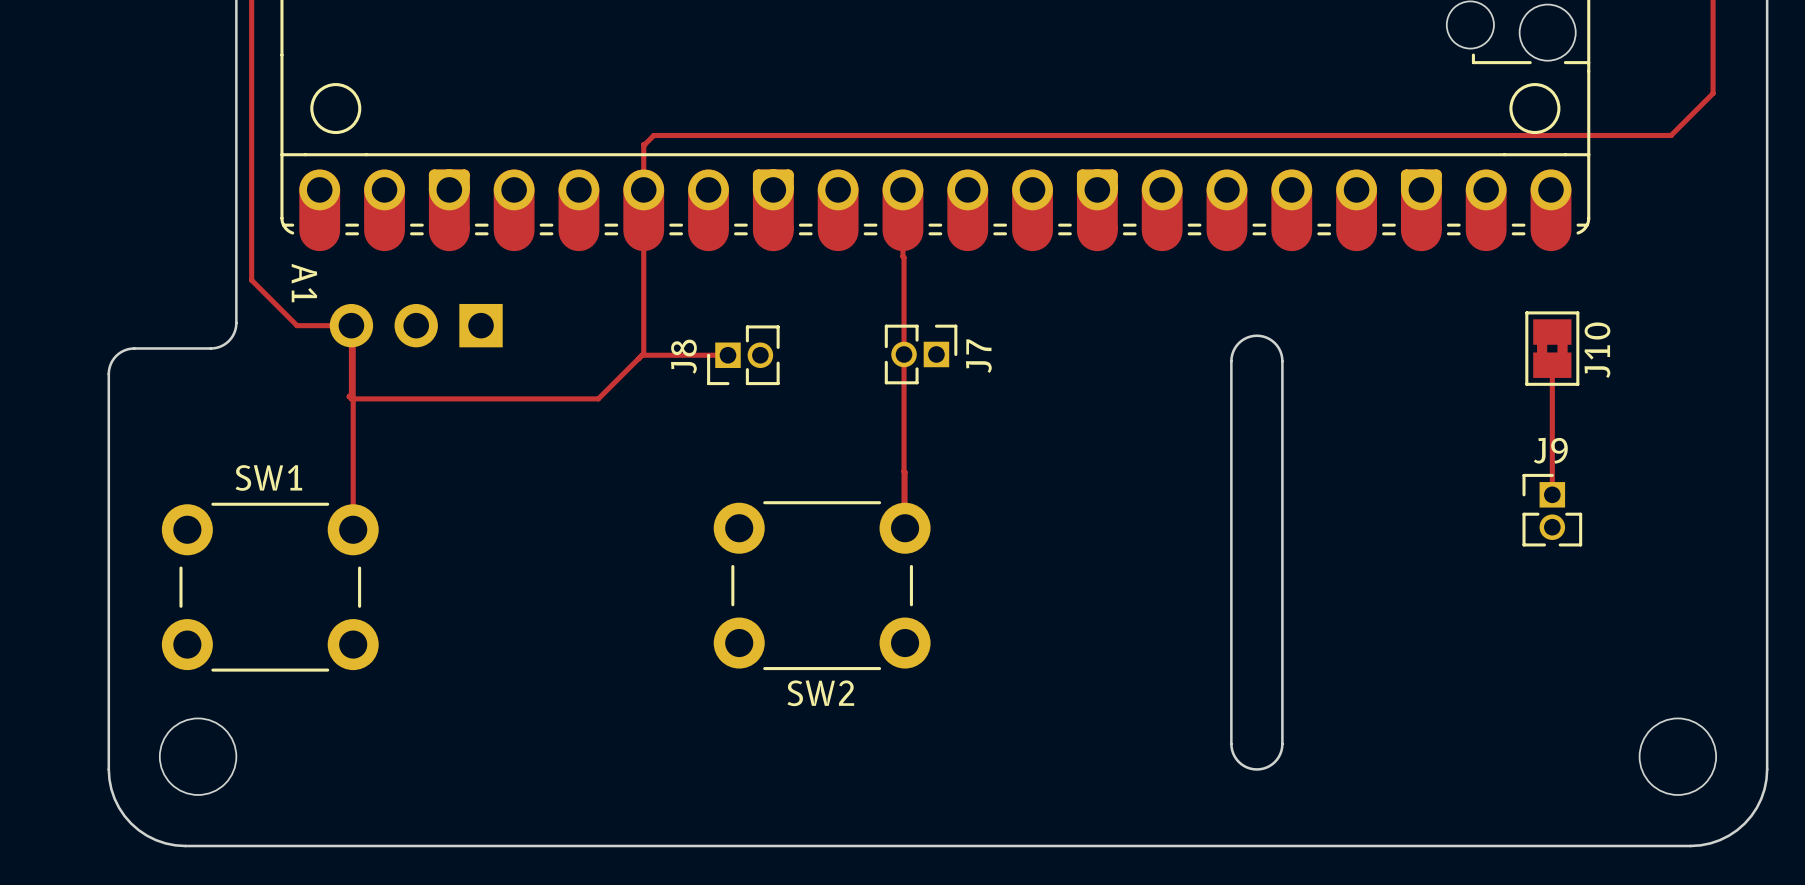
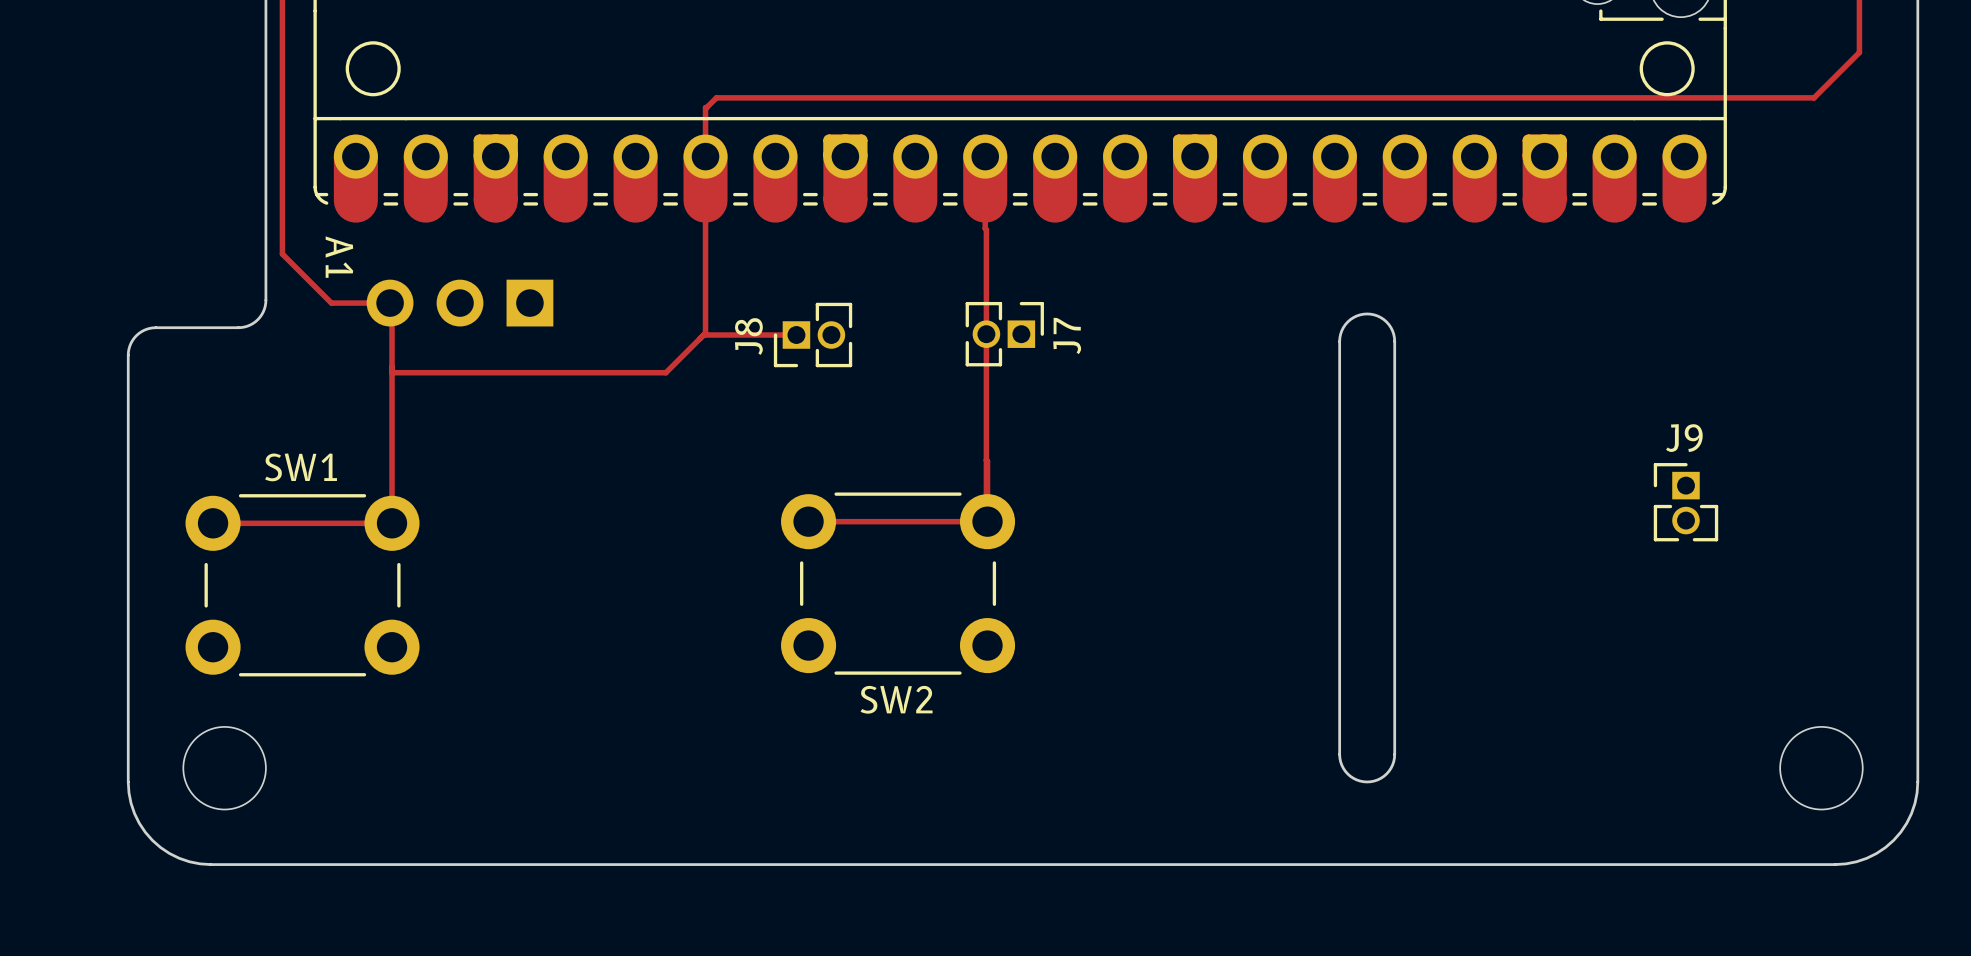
track: (351, 325) (351, 394) (349, 396) (351, 398) (598, 398) (607, 390) -> (392, 372) (665, 372)
J10: (1552, 348) -> none
track: (1552, 365) (1552, 494) -> none
track: none -> (808, 521) (987, 521)
track: none -> (213, 523) (392, 523)

